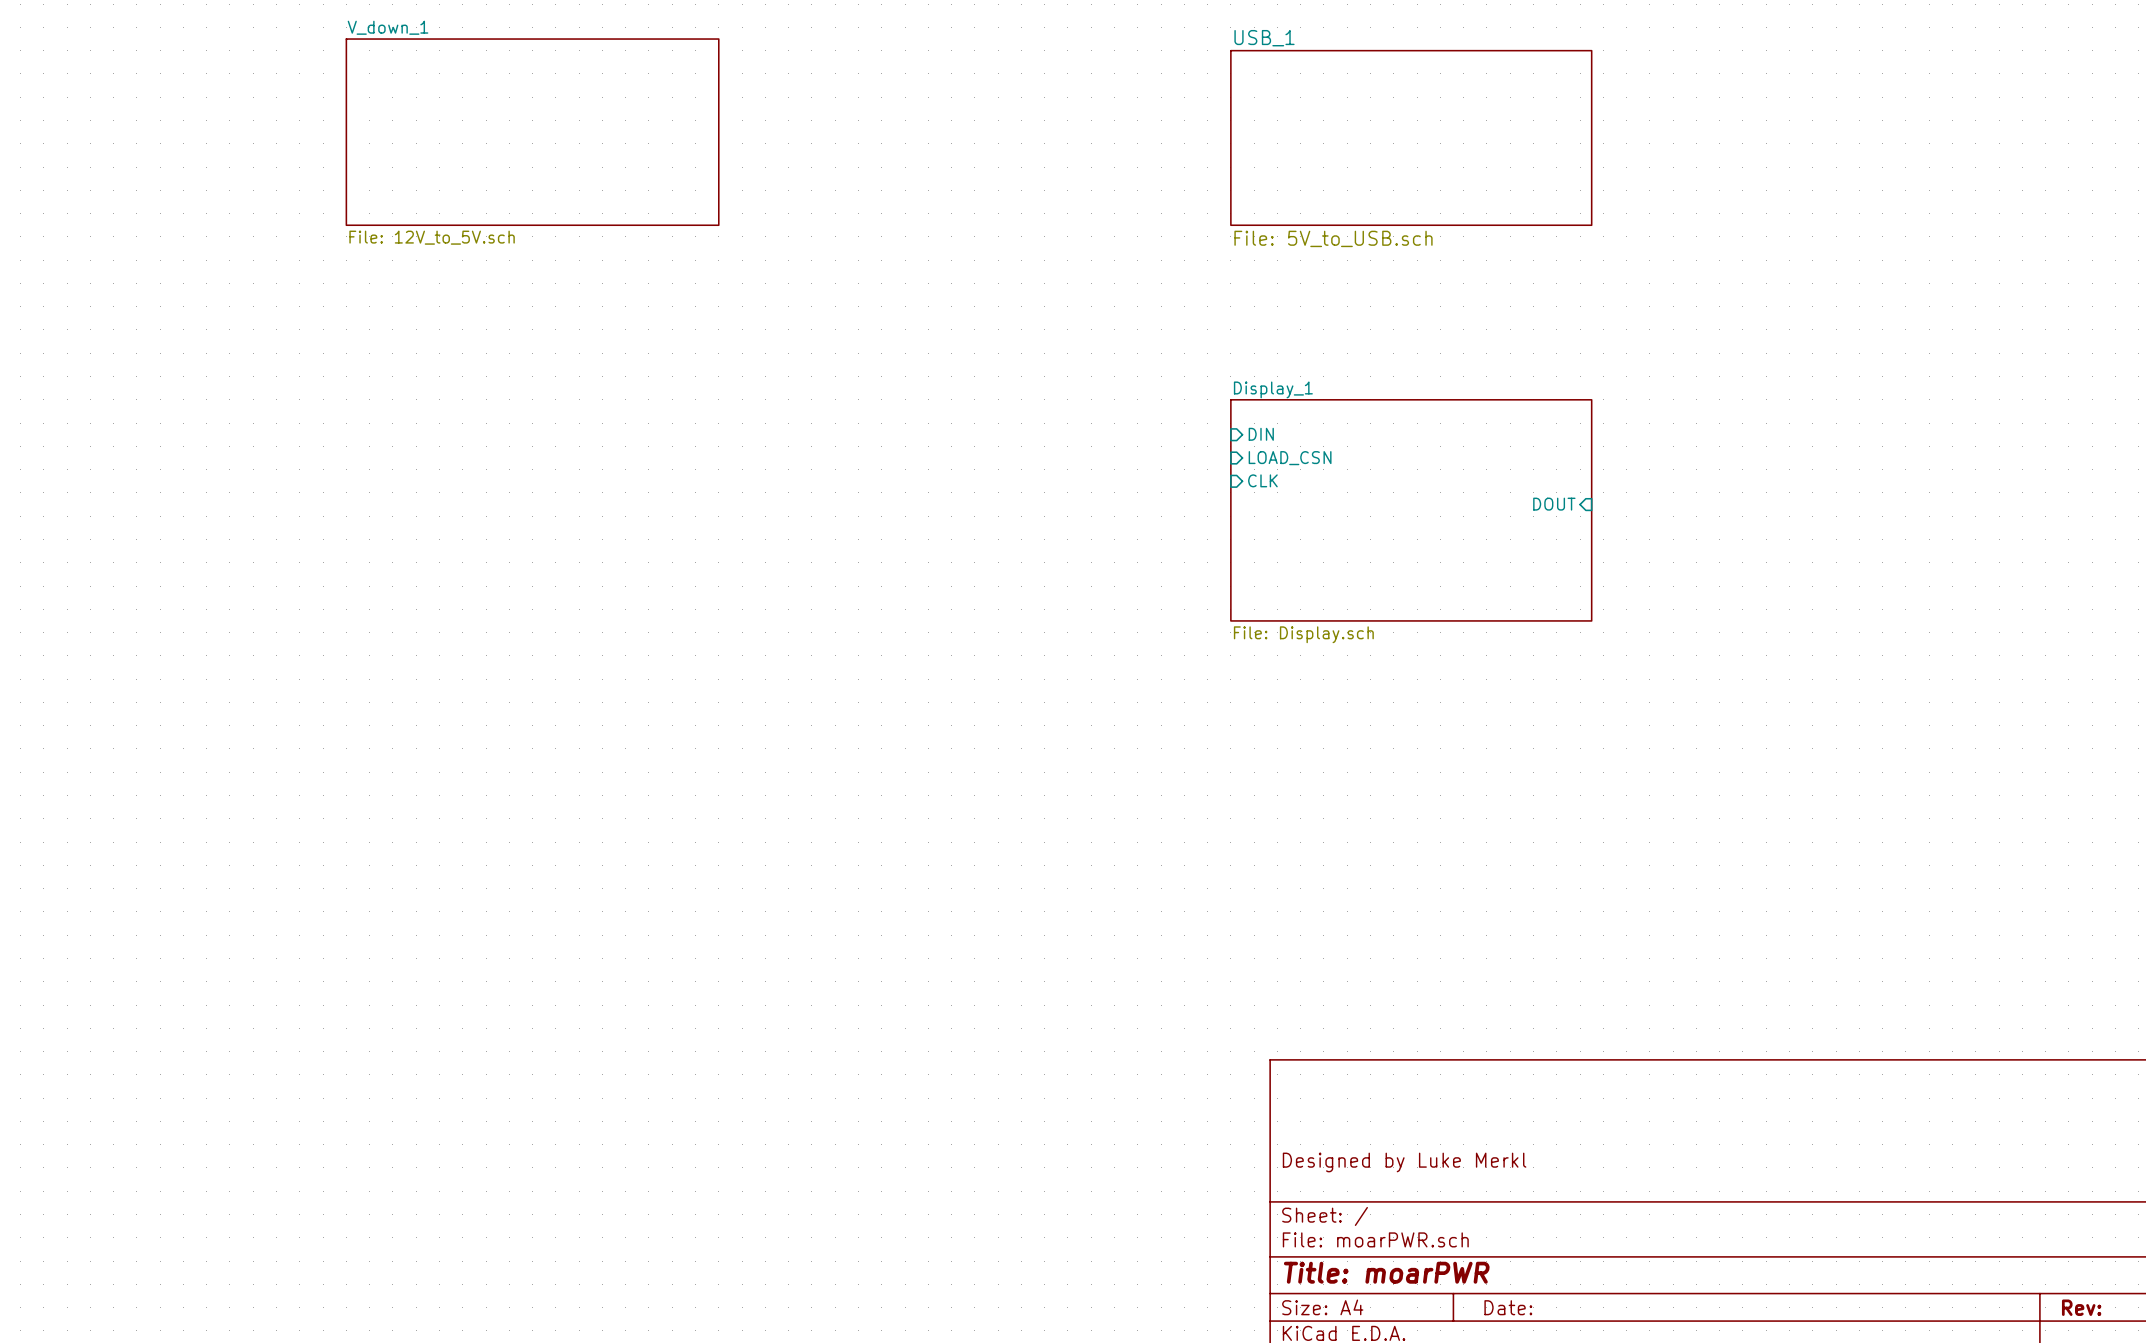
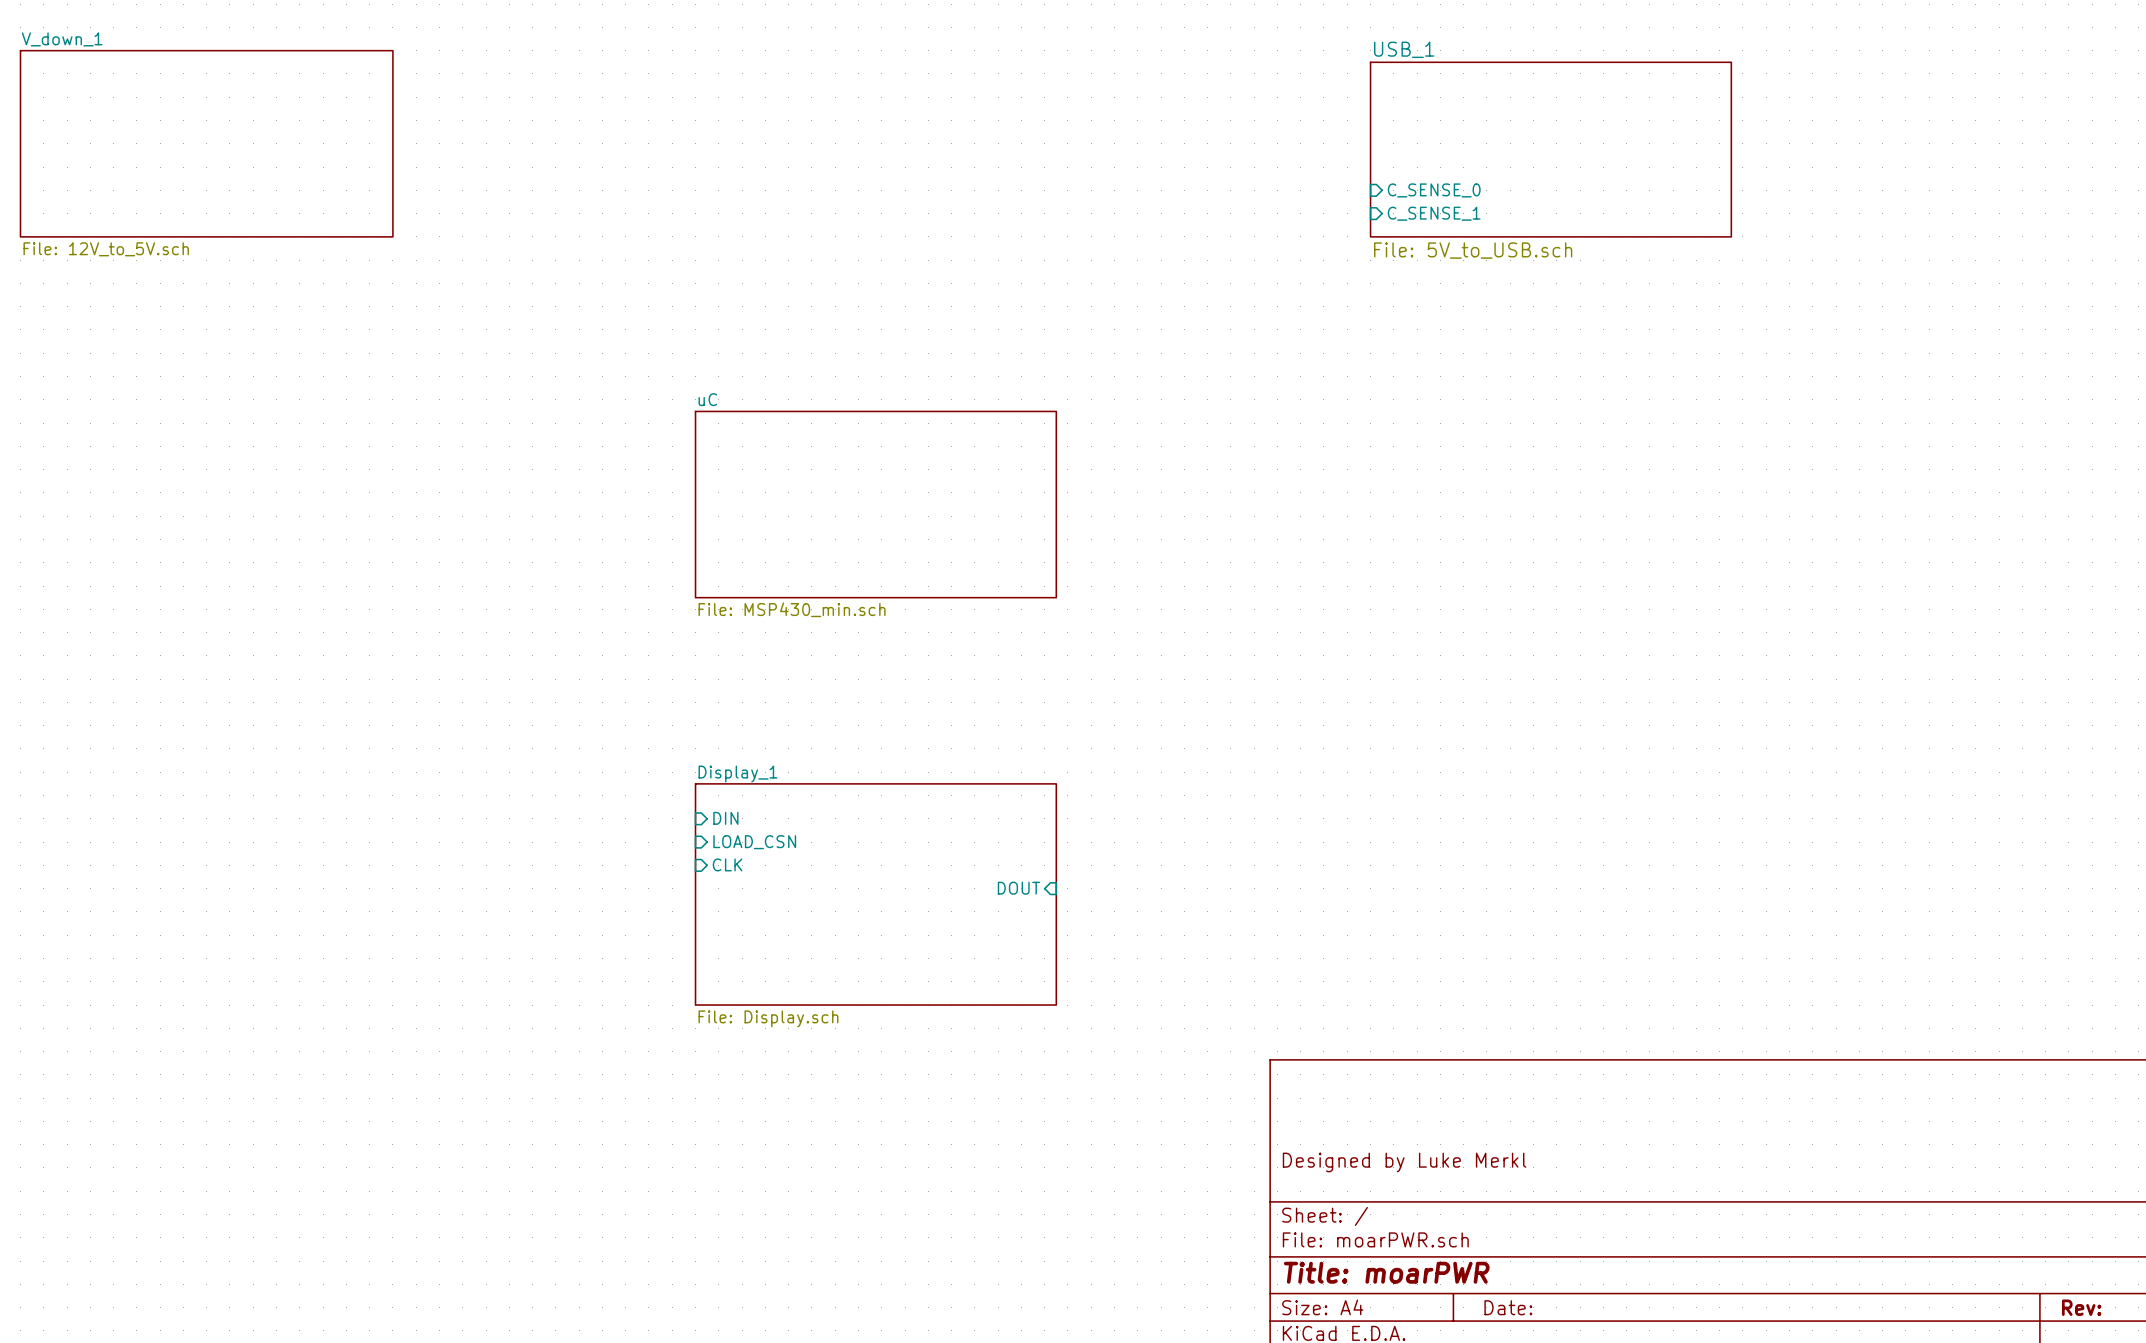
sheet V_down_1 position: (532, 132) -> (206, 143)
sheet USB_1 position: (1411, 137) -> (1550, 149)
sheet pin: none -> C_SENSE_0 (1434, 190)
sheet pin: none -> C_SENSE_1 (1434, 213)
sheet pin: DIN (1261, 434) -> none
sheet pin: LOAD_CSN (1290, 458) -> none
sheet pin: CLK (1262, 480) -> none
sheet uC: none -> File: MSP430_min.sch (875, 504)
sheet pin: DOUT (1554, 504) -> none
sheet Display_1 position: (1411, 510) -> (875, 894)
sheet pin: none -> DIN (725, 818)
sheet pin: none -> LOAD_CSN (754, 842)
sheet pin: none -> CLK (727, 864)
sheet pin: none -> DOUT (1018, 888)

